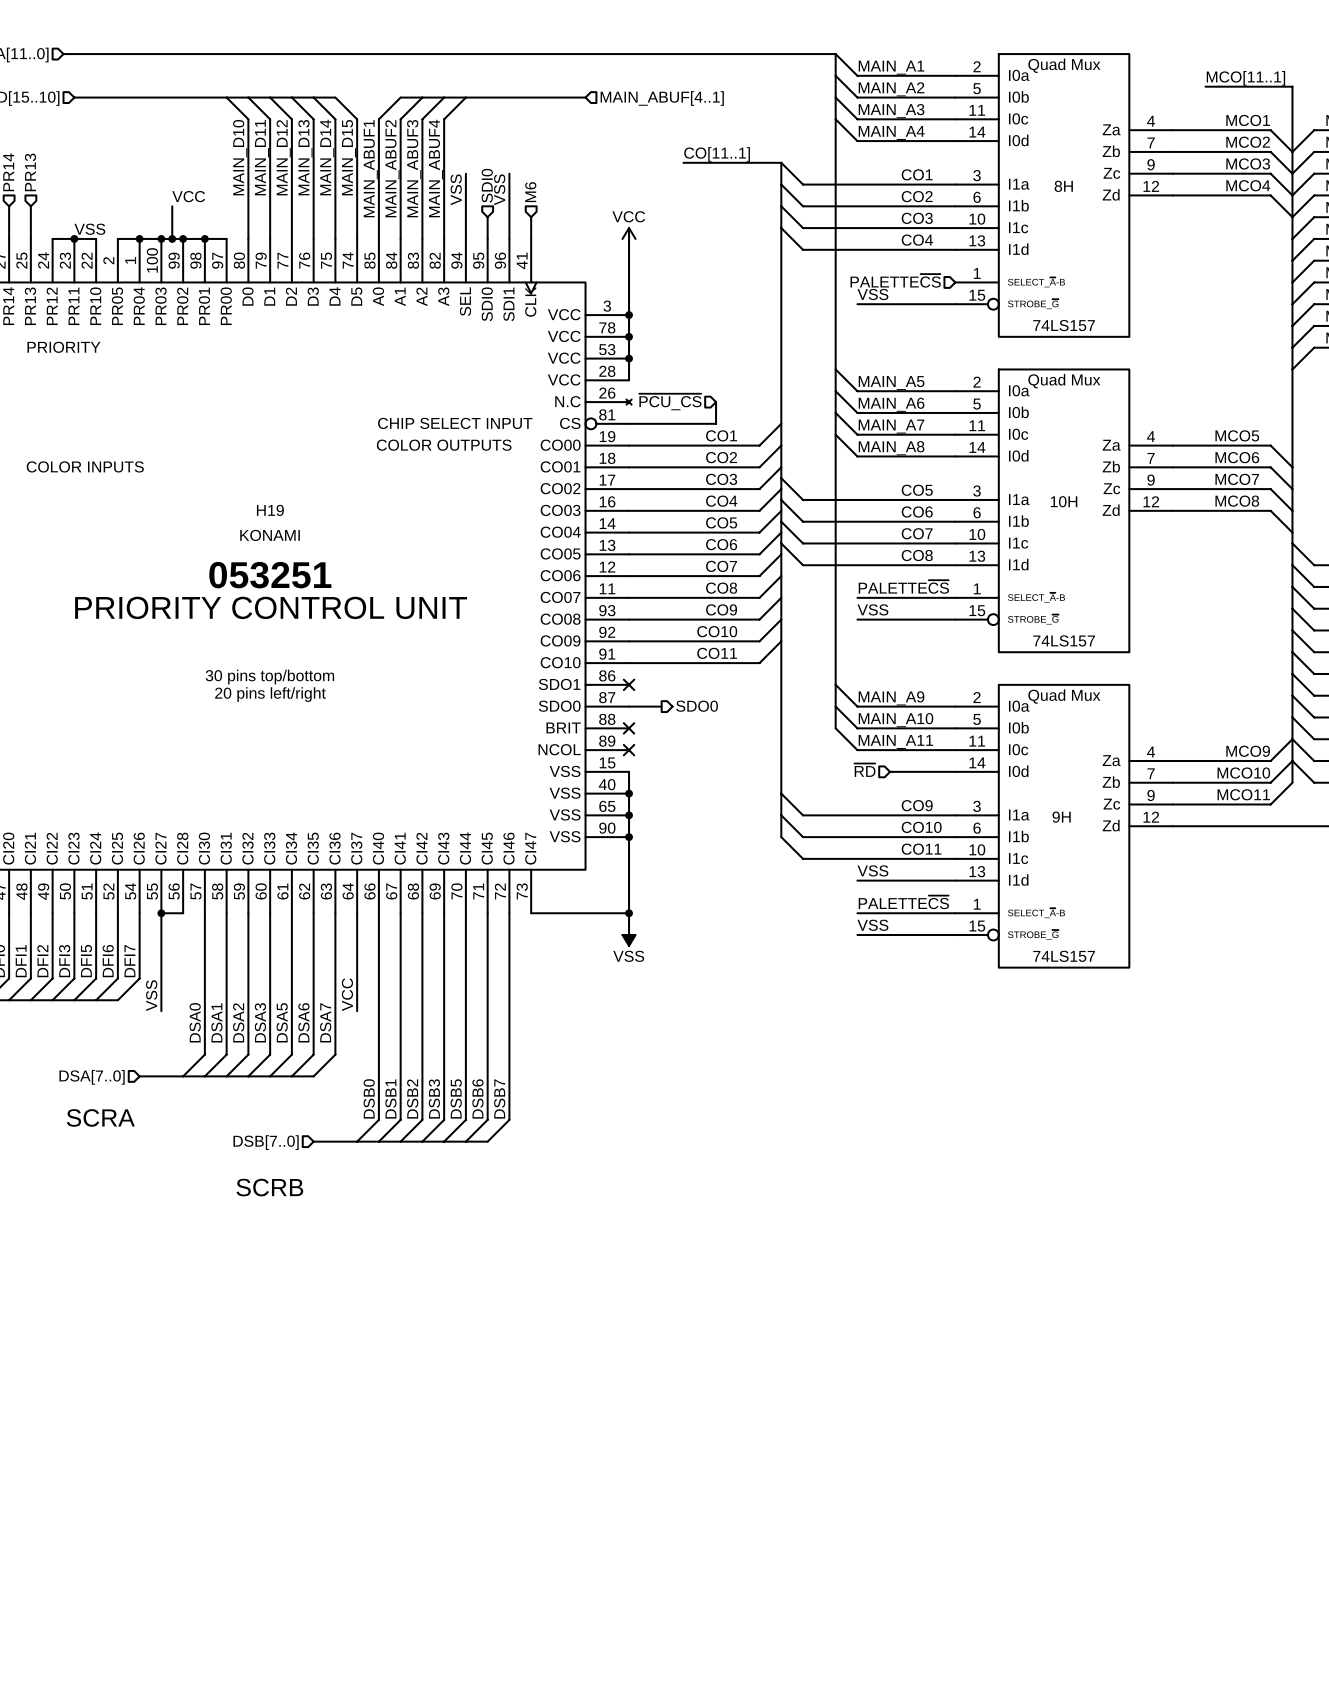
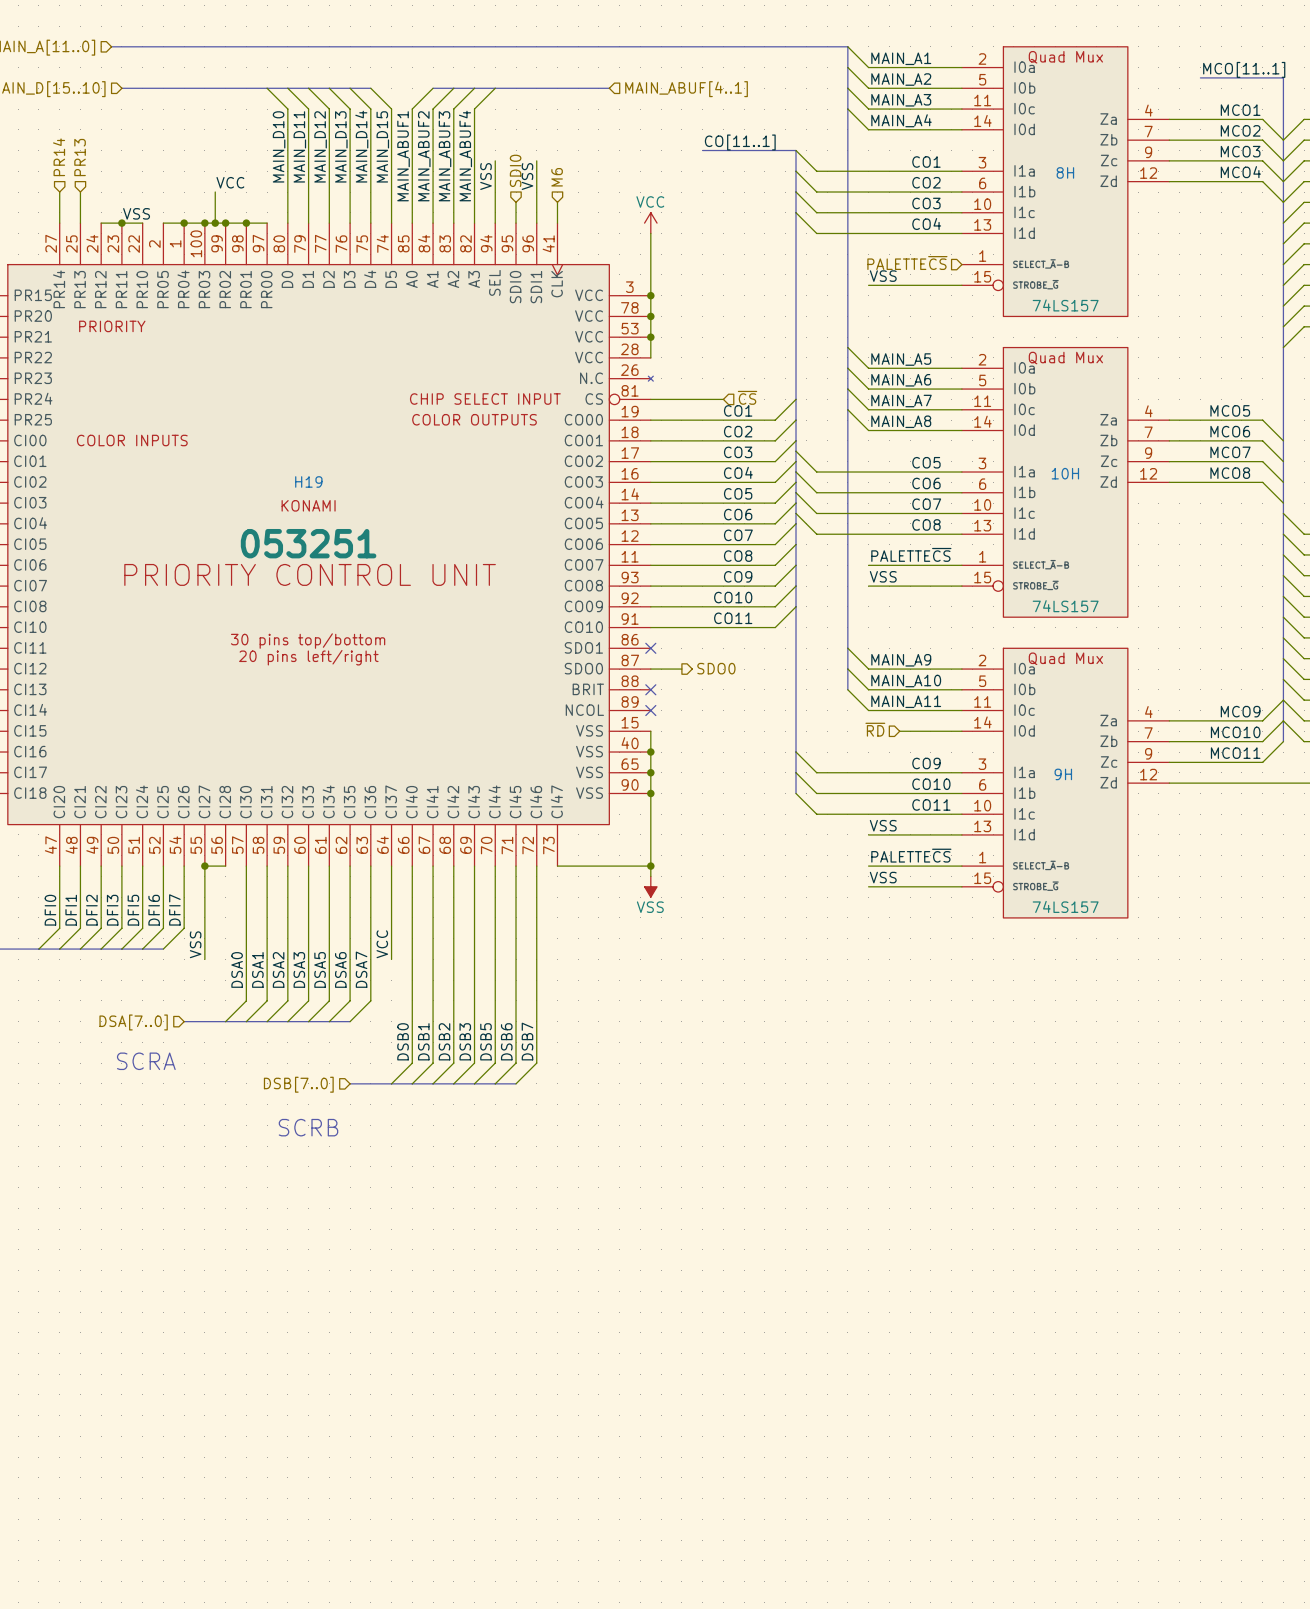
hierarchical label: ~{PCU_CS} (670, 402) -> none
wire: (716, 402) (716, 423) (705, 423) -> none
hierarchical label: none -> ~{CS} (747, 397)

